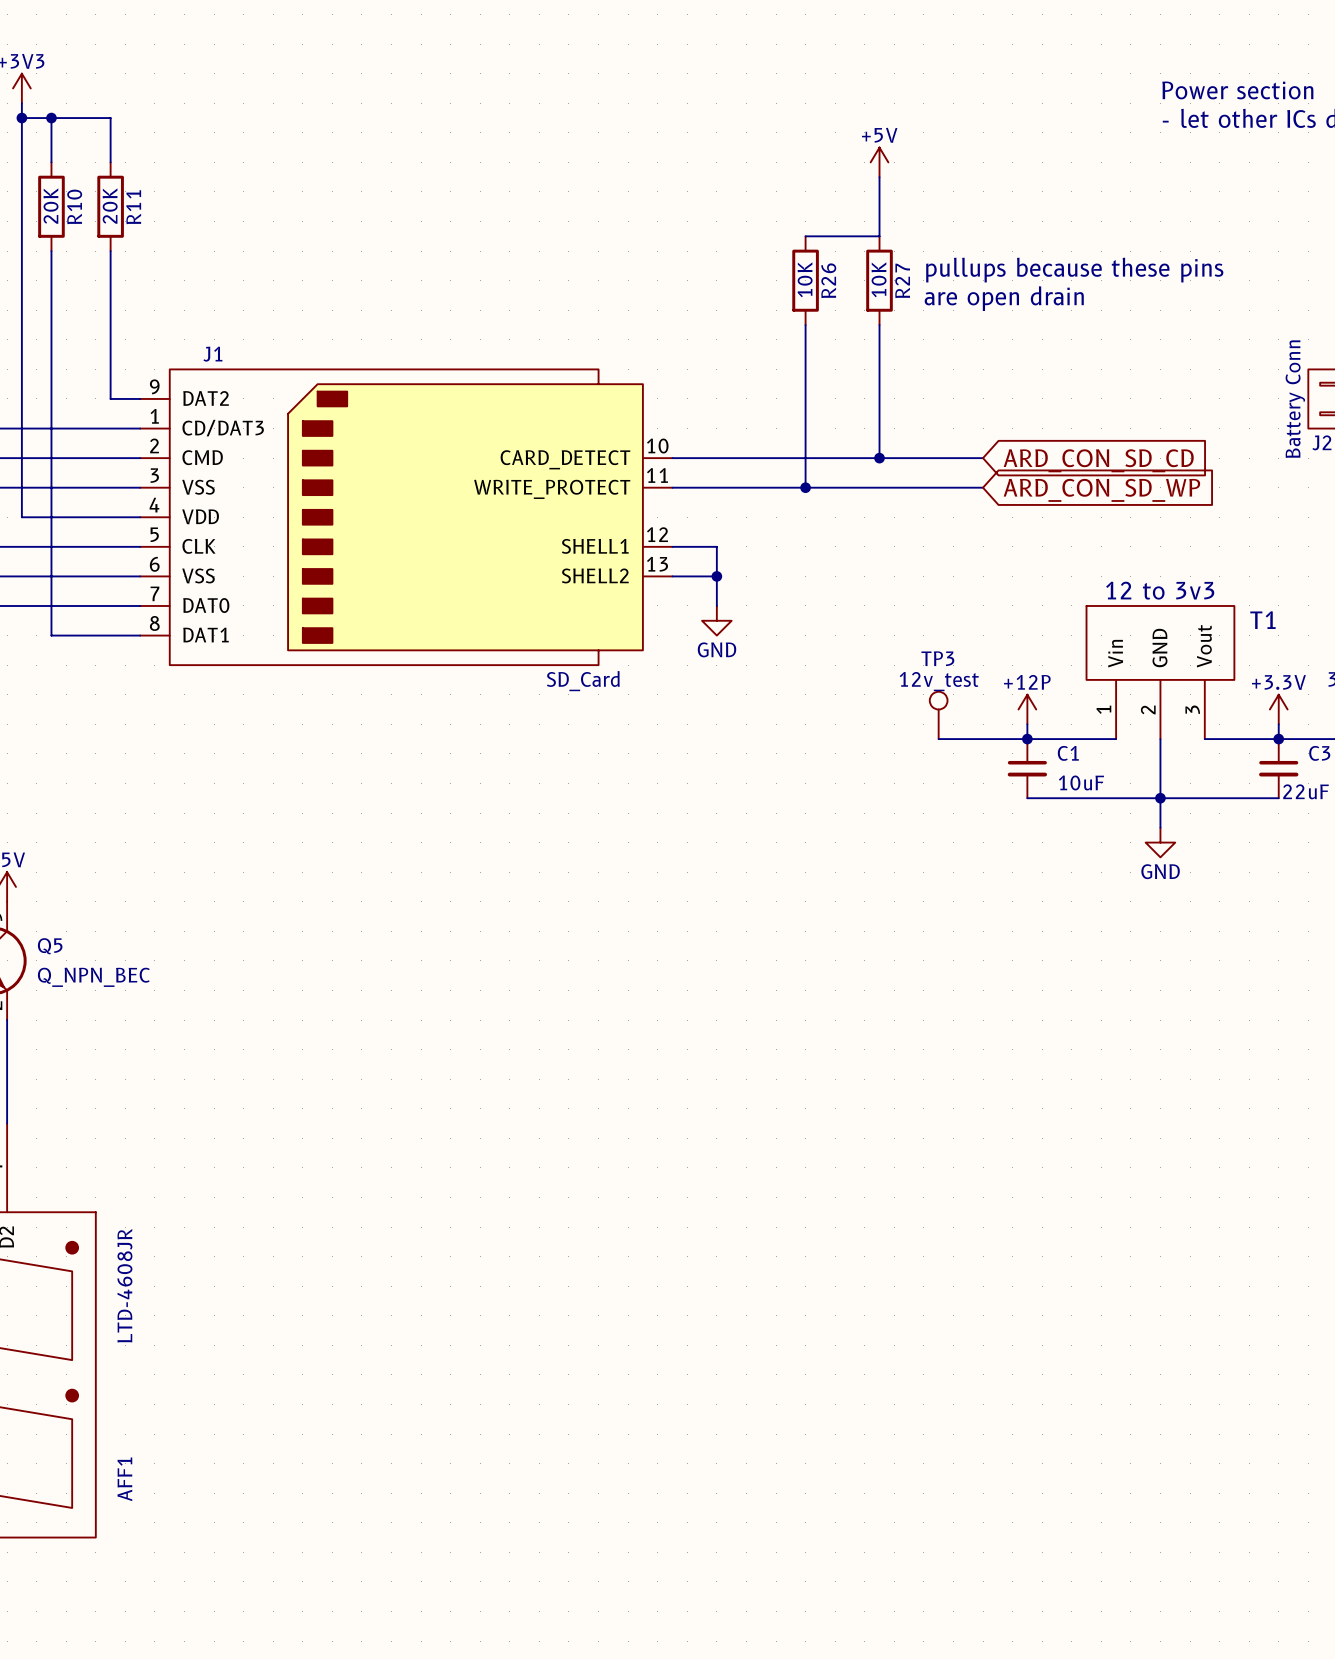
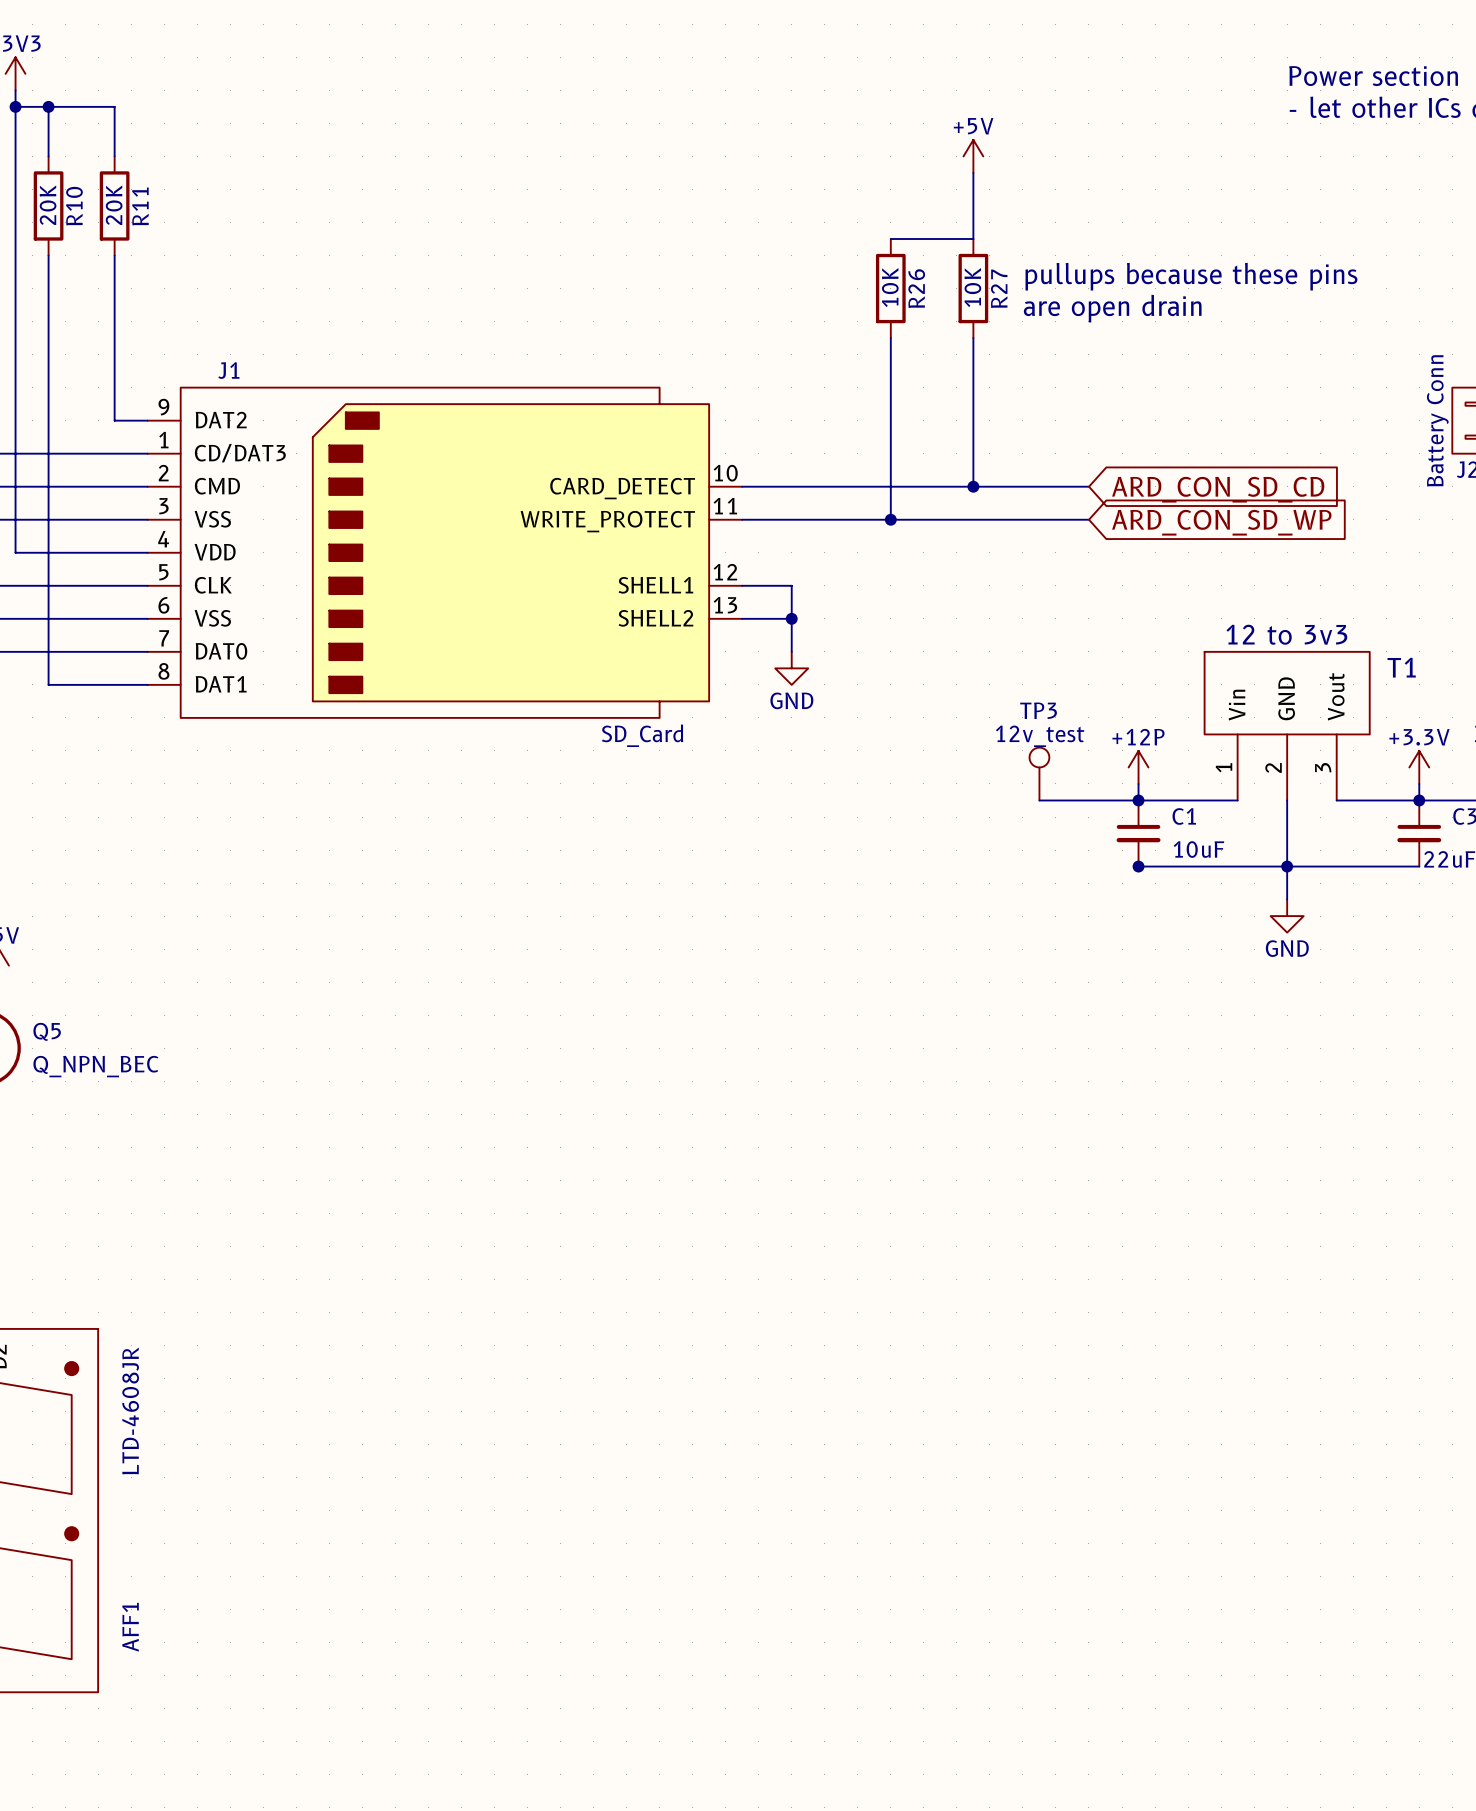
junction: none -> (1138, 866)

